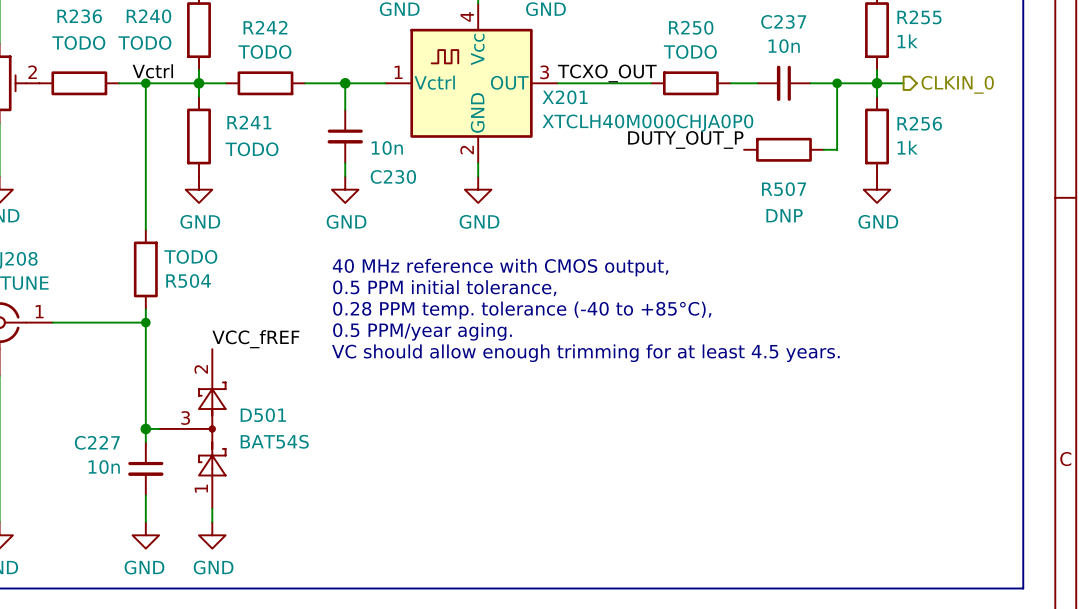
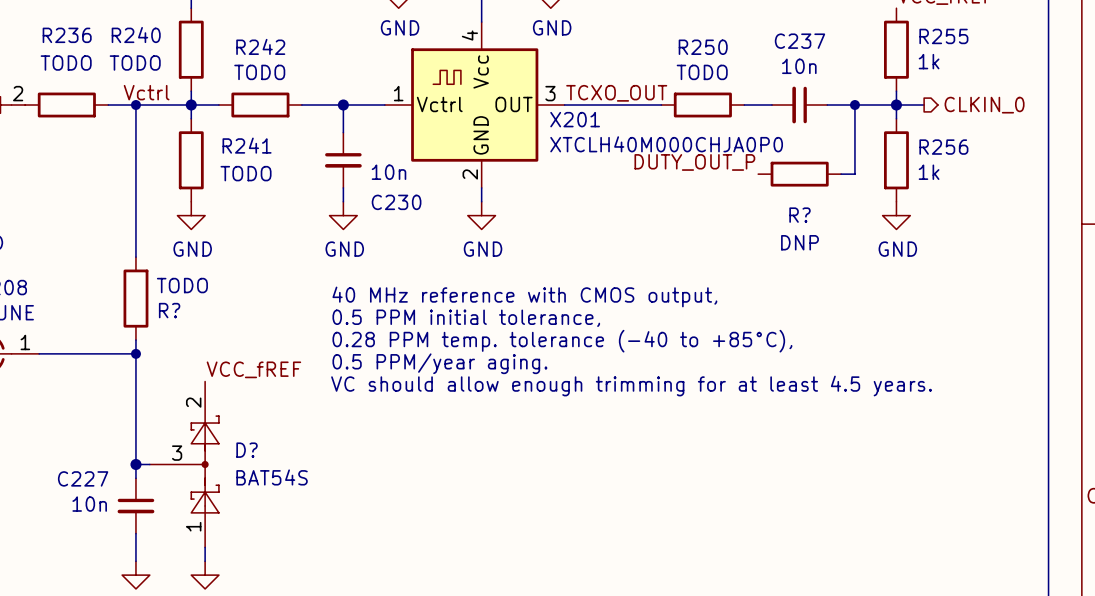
R507 name: R507 (784, 189) -> R? (799, 215)
R504 name: R504 (188, 280) -> R? (169, 310)
D501 name: D501 (263, 415) -> D? (247, 450)

